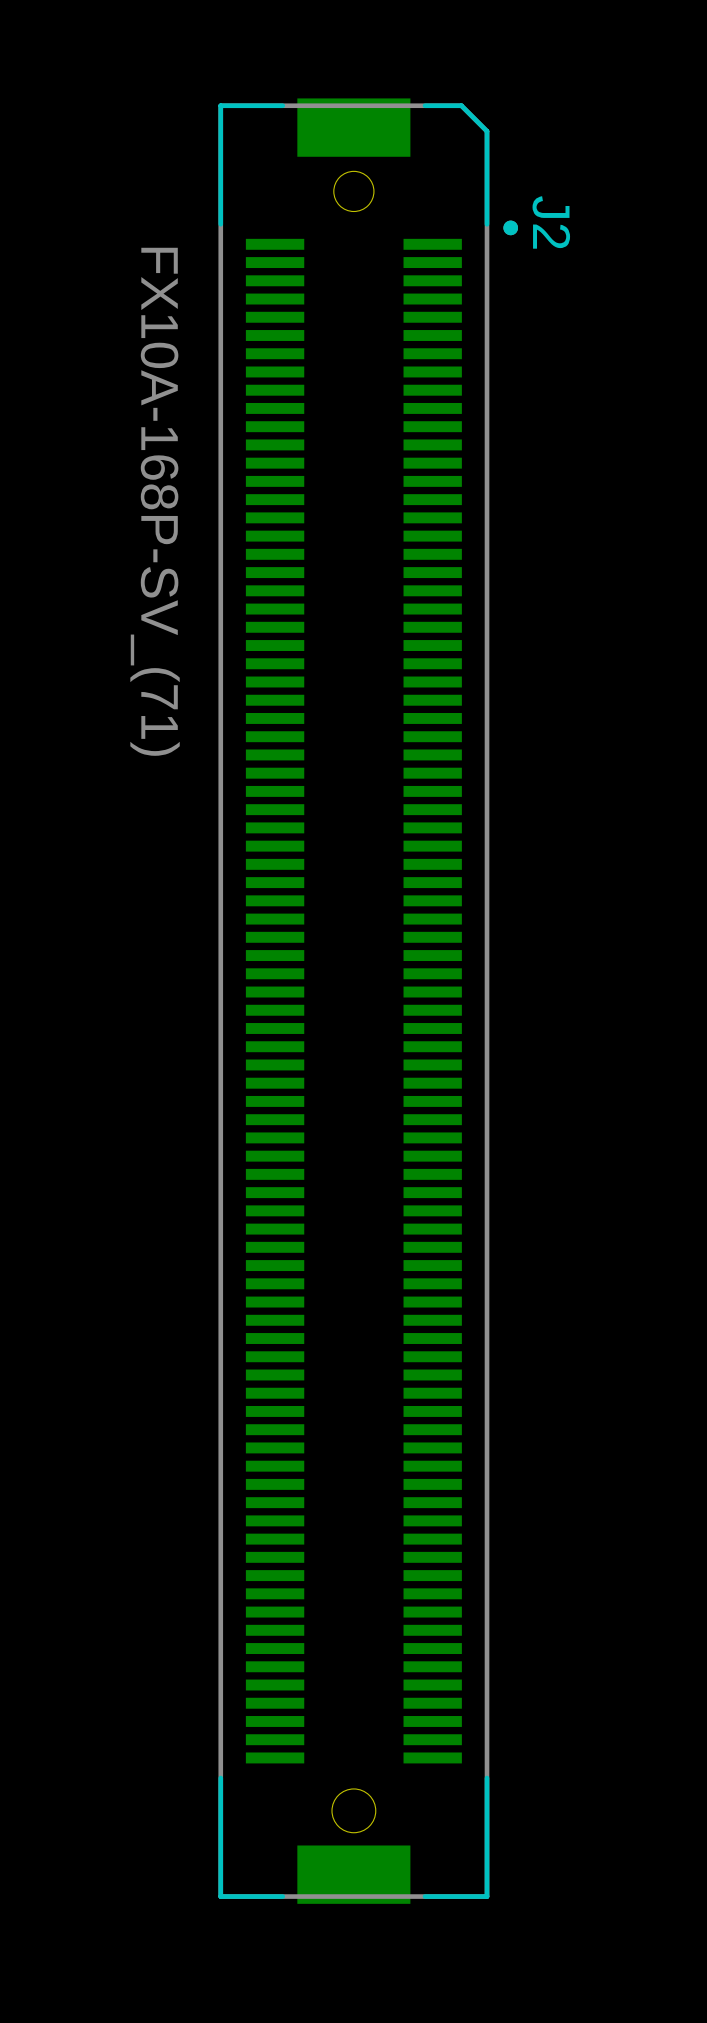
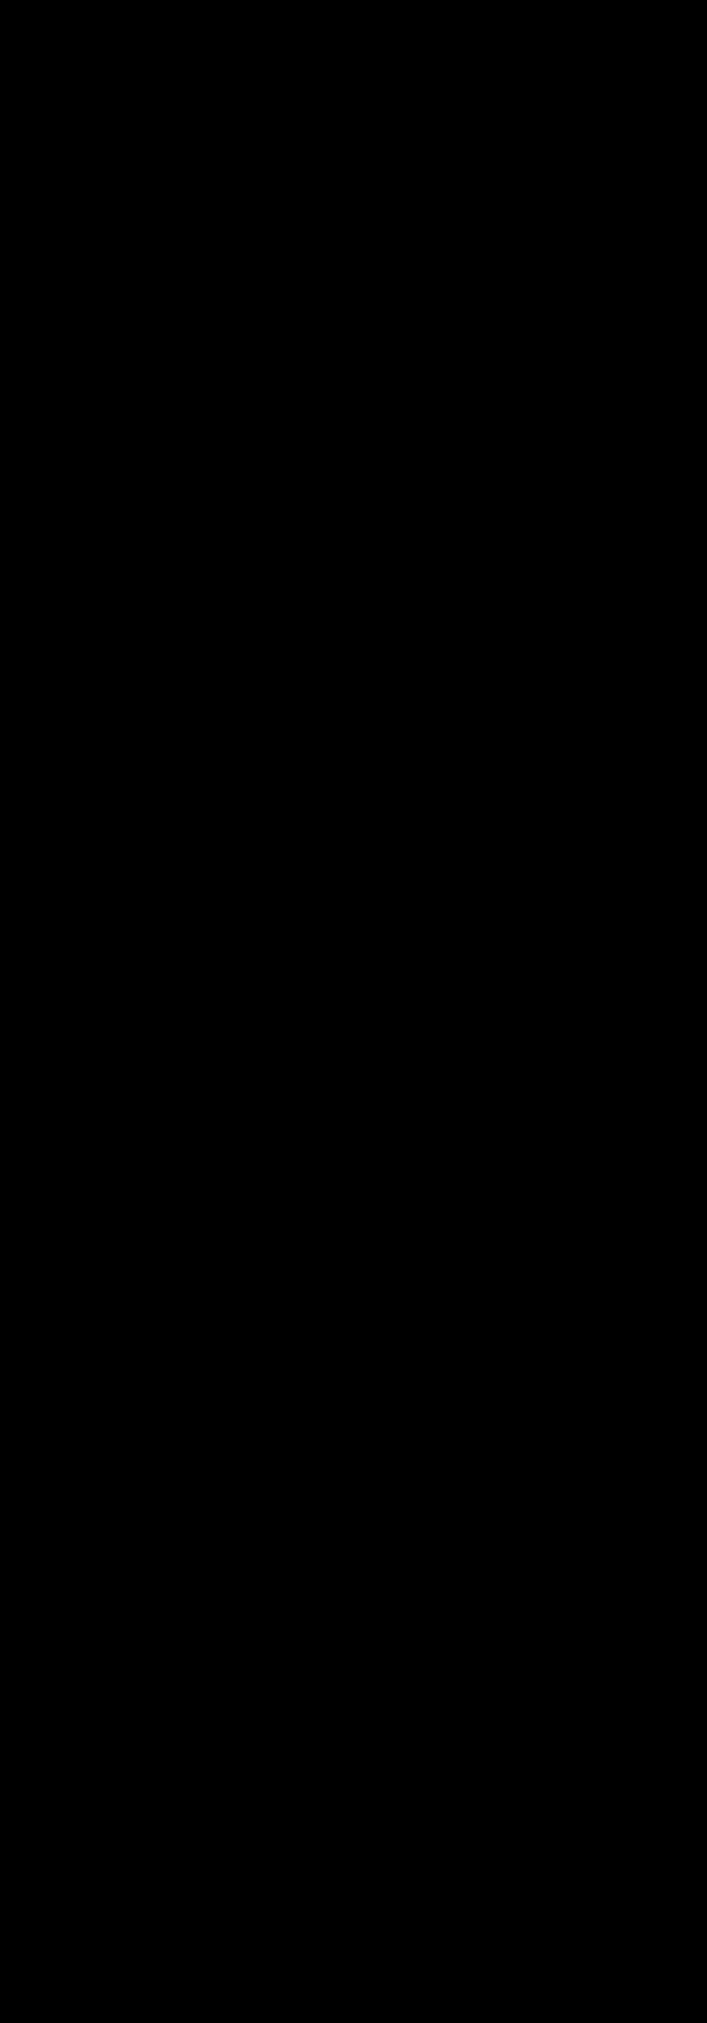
J2: FX10A-168P-SV_(71) (368, 1001) -> none

